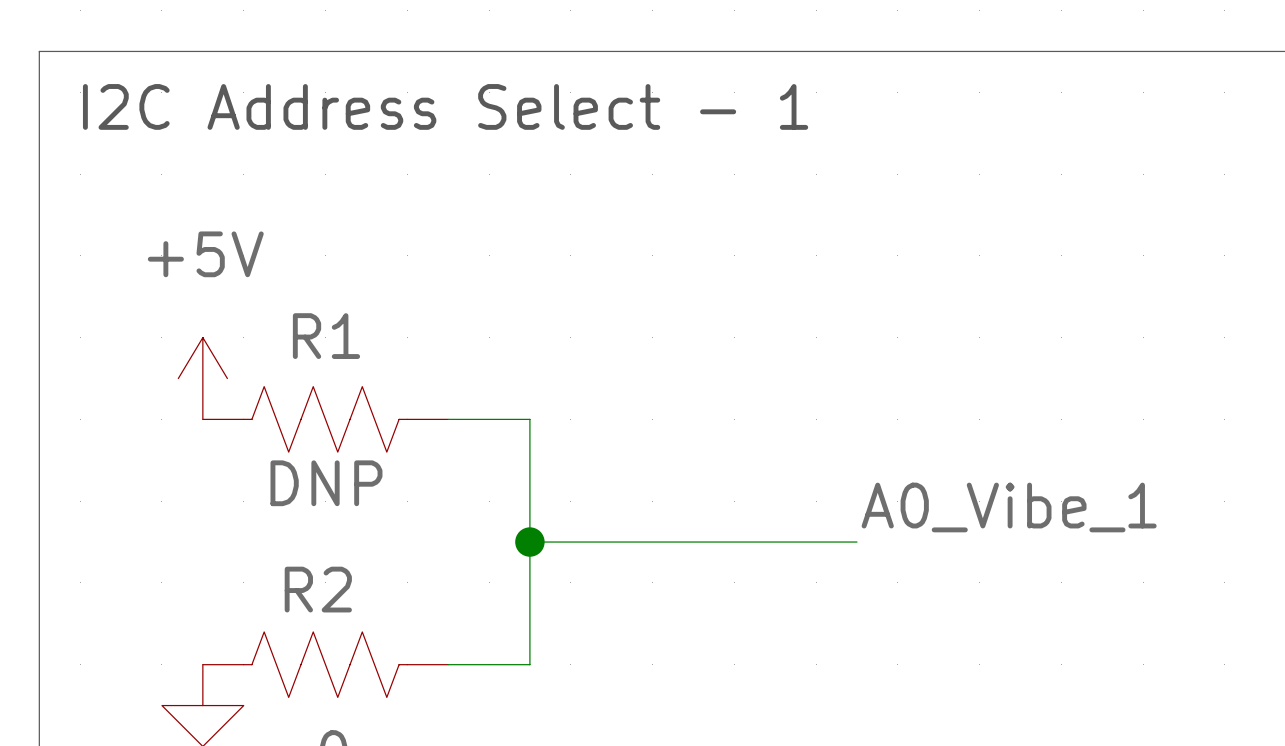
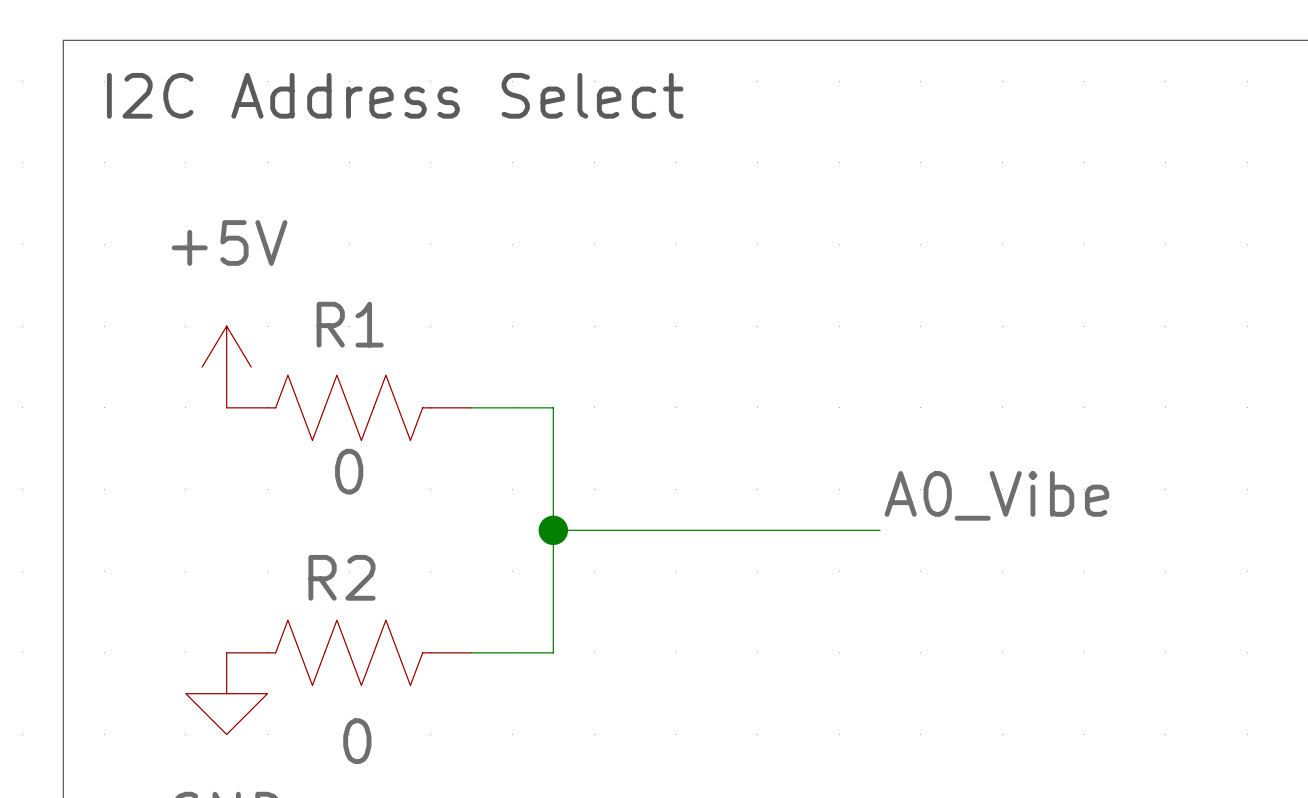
text: I2C Address Select - 1 (445, 106) -> I2C Address Select (395, 95)
R1 value: DNP (326, 483) -> 0 (349, 471)
label: A0_Vibe_1 (1009, 507) -> A0_Vibe (996, 495)

